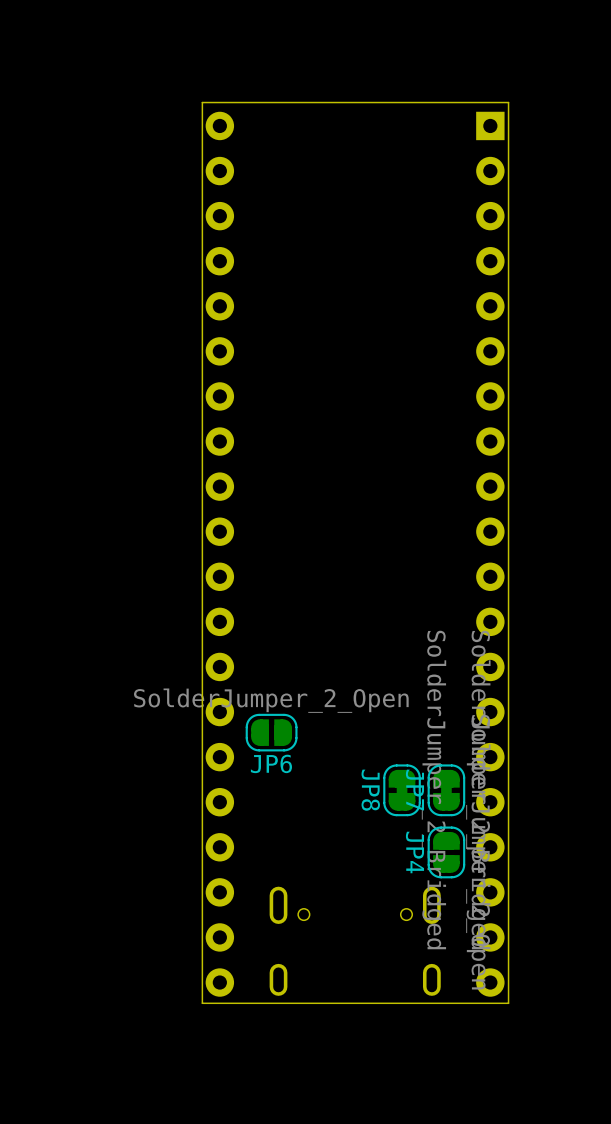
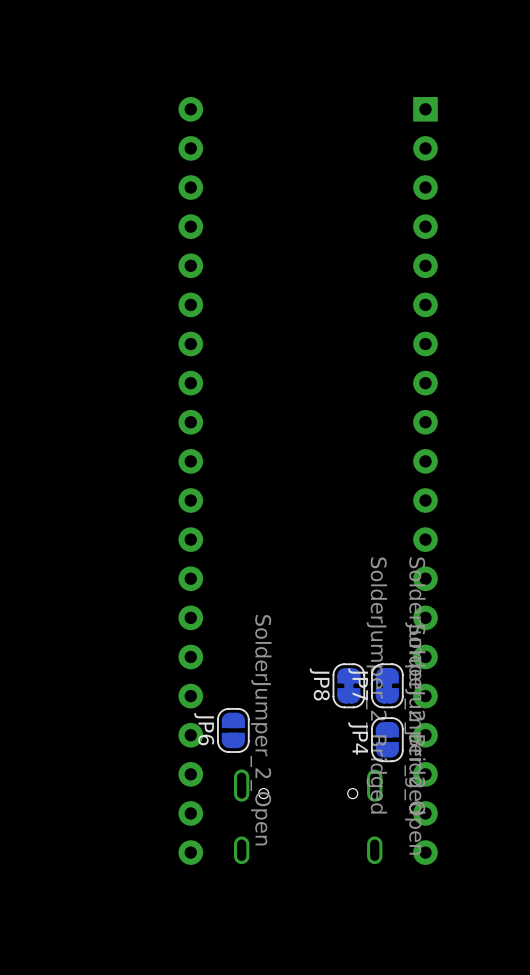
board edge: (508, 102) (202, 102) (202, 1003) (508, 1003) (508, 102) -> none
JP6 rotation: 0° (271, 732) -> 90° clockwise (233, 730)
JP6 position: (271, 732) -> (233, 730)

